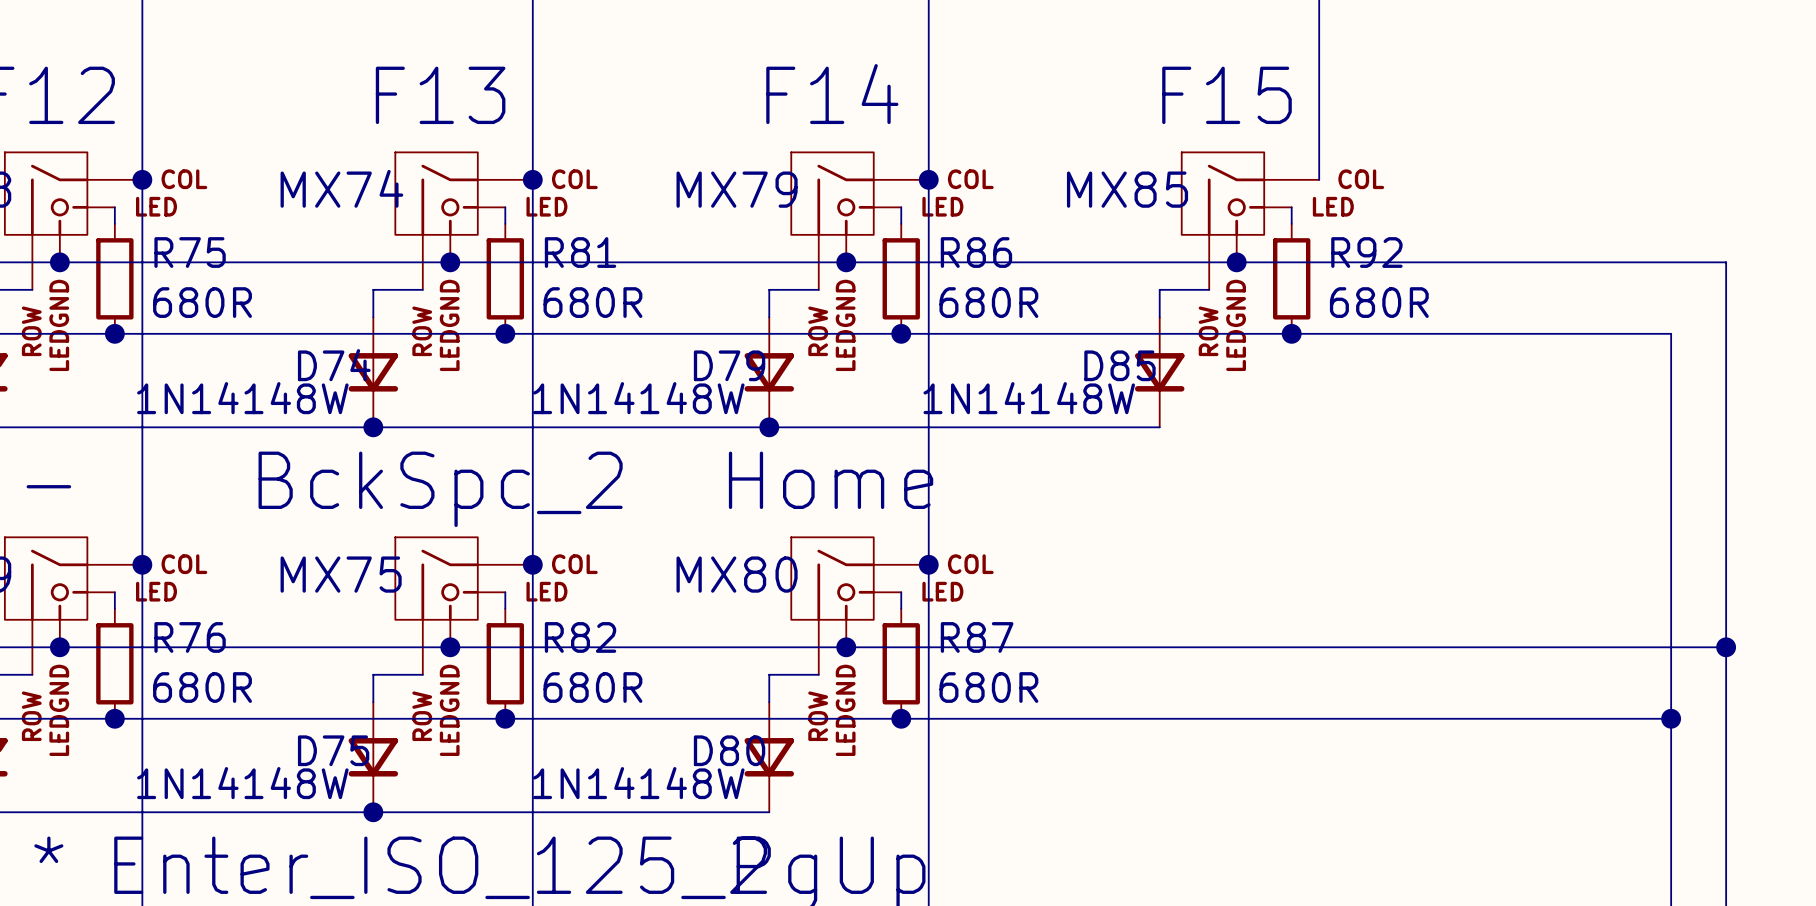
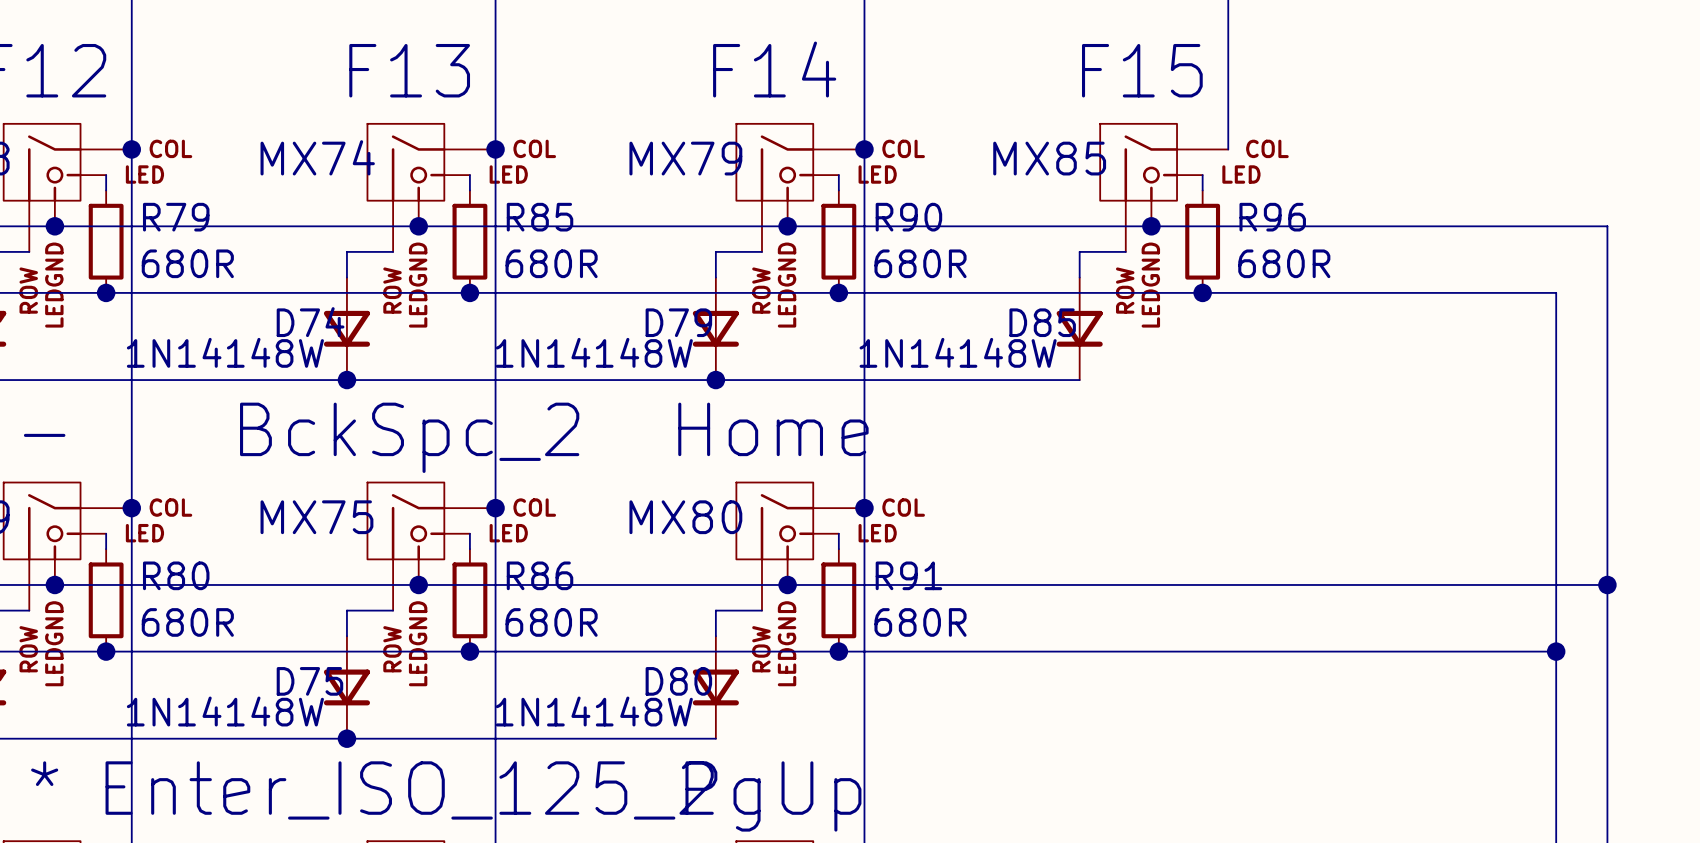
R75 name: R75 (190, 252) -> R79 (176, 217)
R81 name: R81 (580, 252) -> R85 (540, 217)
R86 name: R86 (976, 252) -> R90 (908, 217)
R92 name: R92 (1366, 252) -> R96 (1272, 217)
R76 name: R76 (190, 637) -> R80 (176, 575)
R82 name: R82 (580, 637) -> R86 (540, 575)
R87 name: R87 (977, 637) -> R91 (908, 575)

